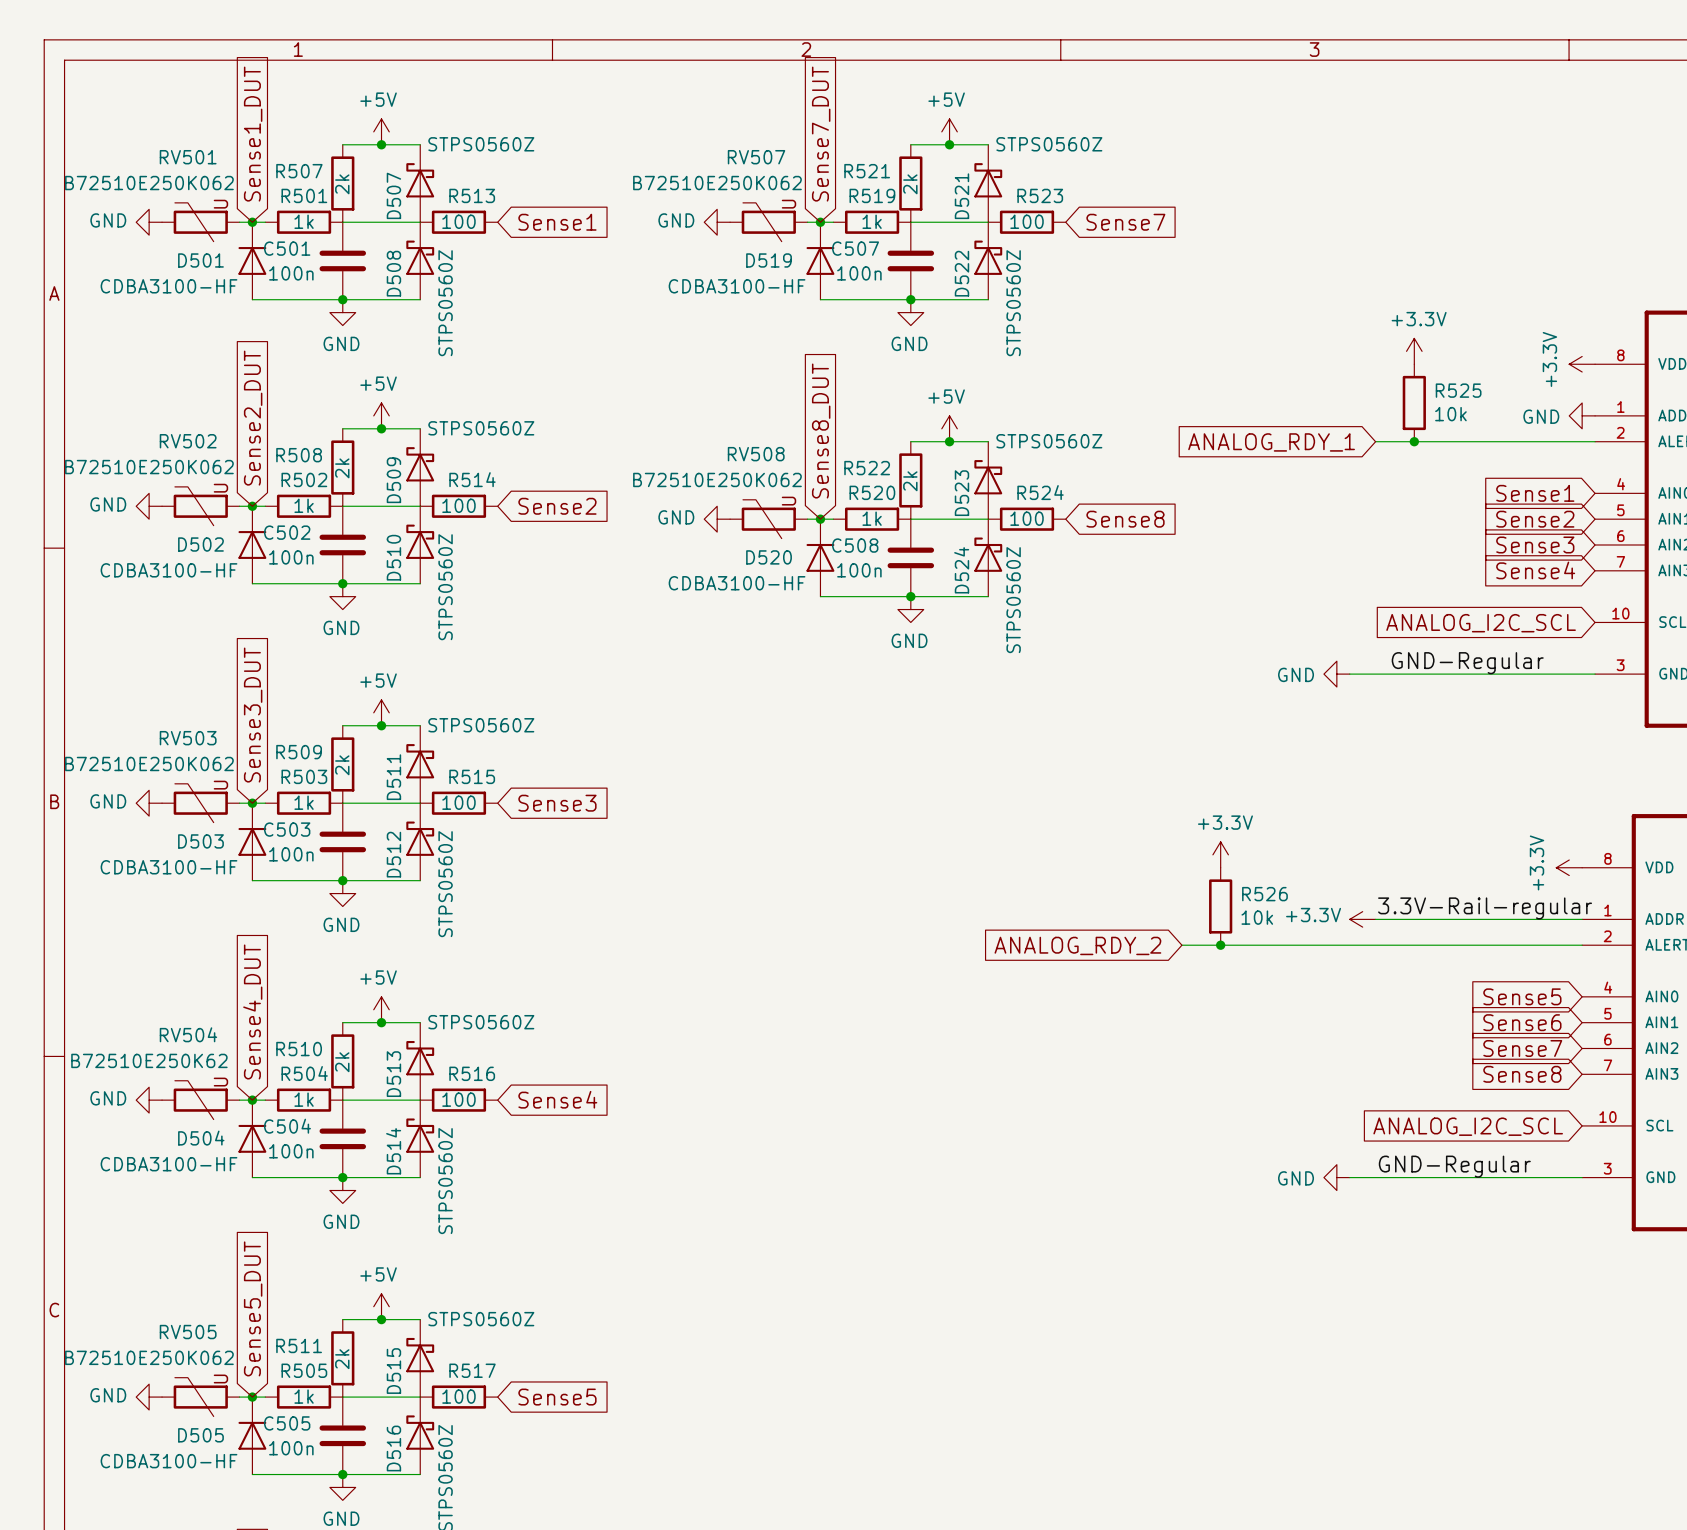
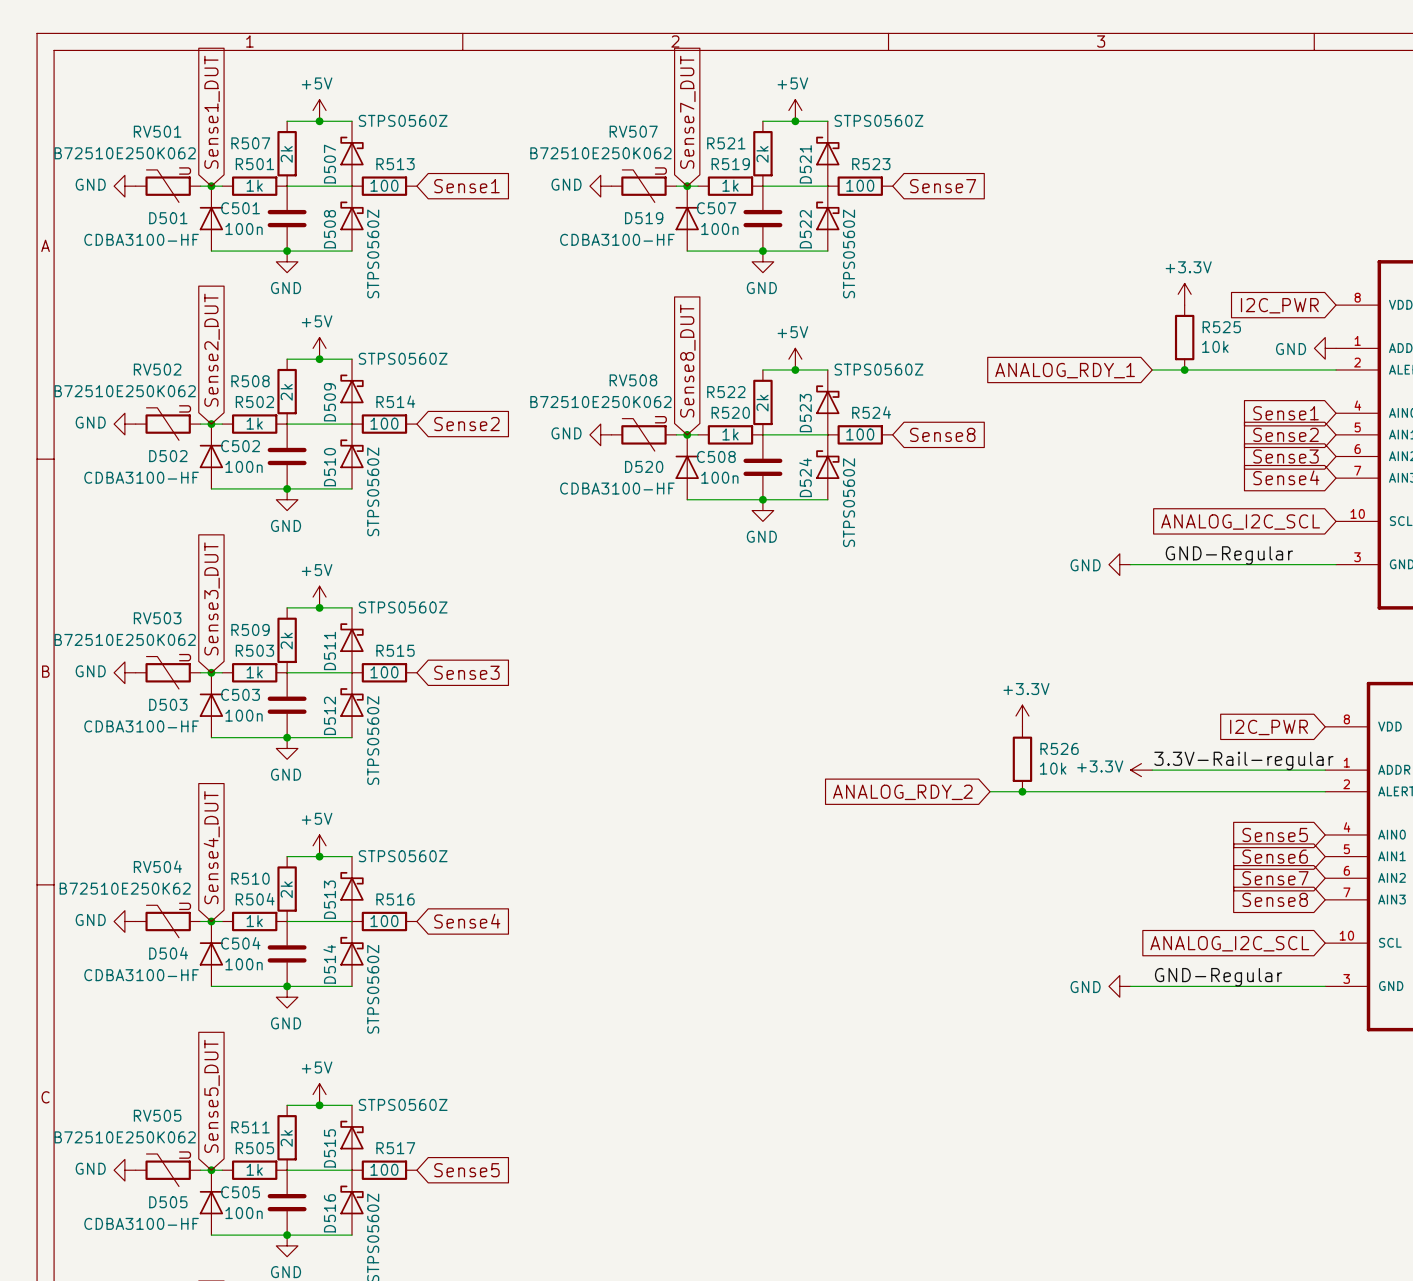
global label: none -> I2C_PWR (1279, 305)
power symbol: +3.3V (1582, 364) -> none
power symbol: +3.3V (1569, 867) -> none
global label: none -> I2C_PWR (1269, 727)

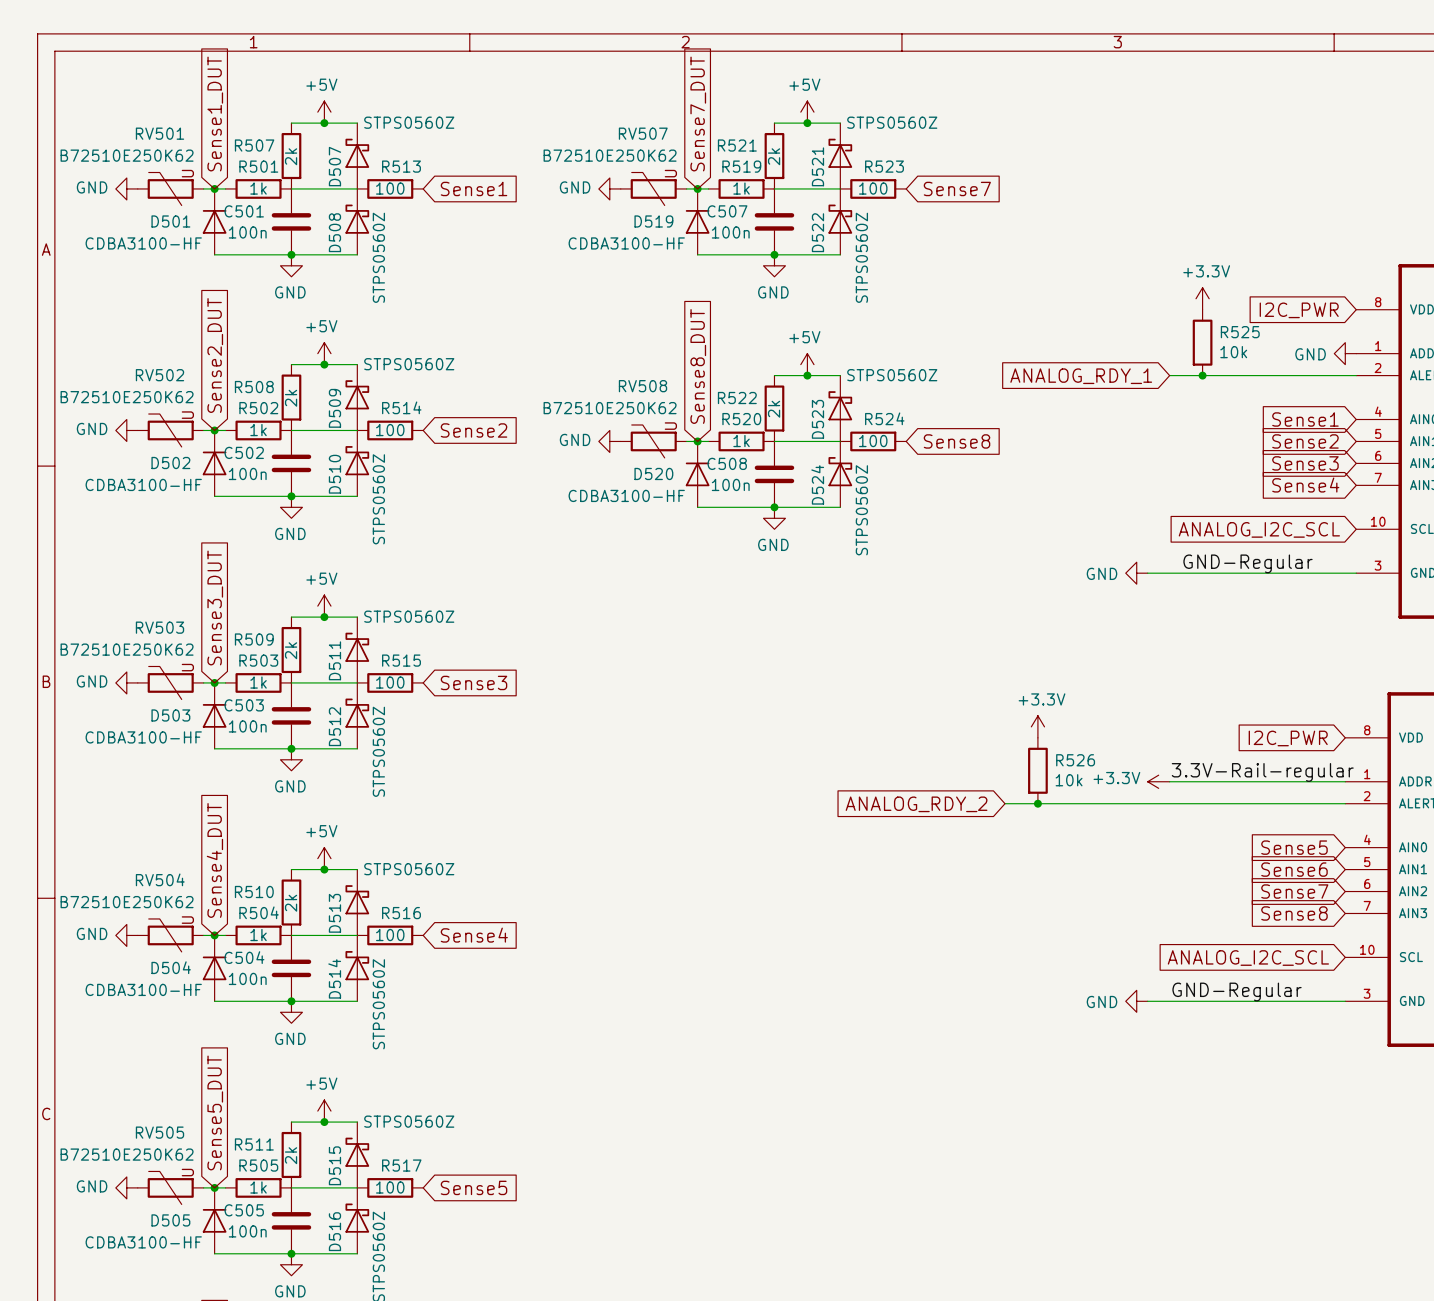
RV501 value: B72510E250K062 (125, 153) -> B72510E250K62 (127, 155)
RV507 value: B72510E250K062 (600, 153) -> B72510E250K62 (610, 155)
RV502 value: B72510E250K062 (125, 391) -> B72510E250K62 (127, 397)
RV508 value: B72510E250K062 (600, 402) -> B72510E250K62 (610, 408)
RV503 value: B72510E250K062 (125, 639) -> B72510E250K62 (127, 649)
RV505 value: B72510E250K062 (125, 1137) -> B72510E250K62 (127, 1154)

